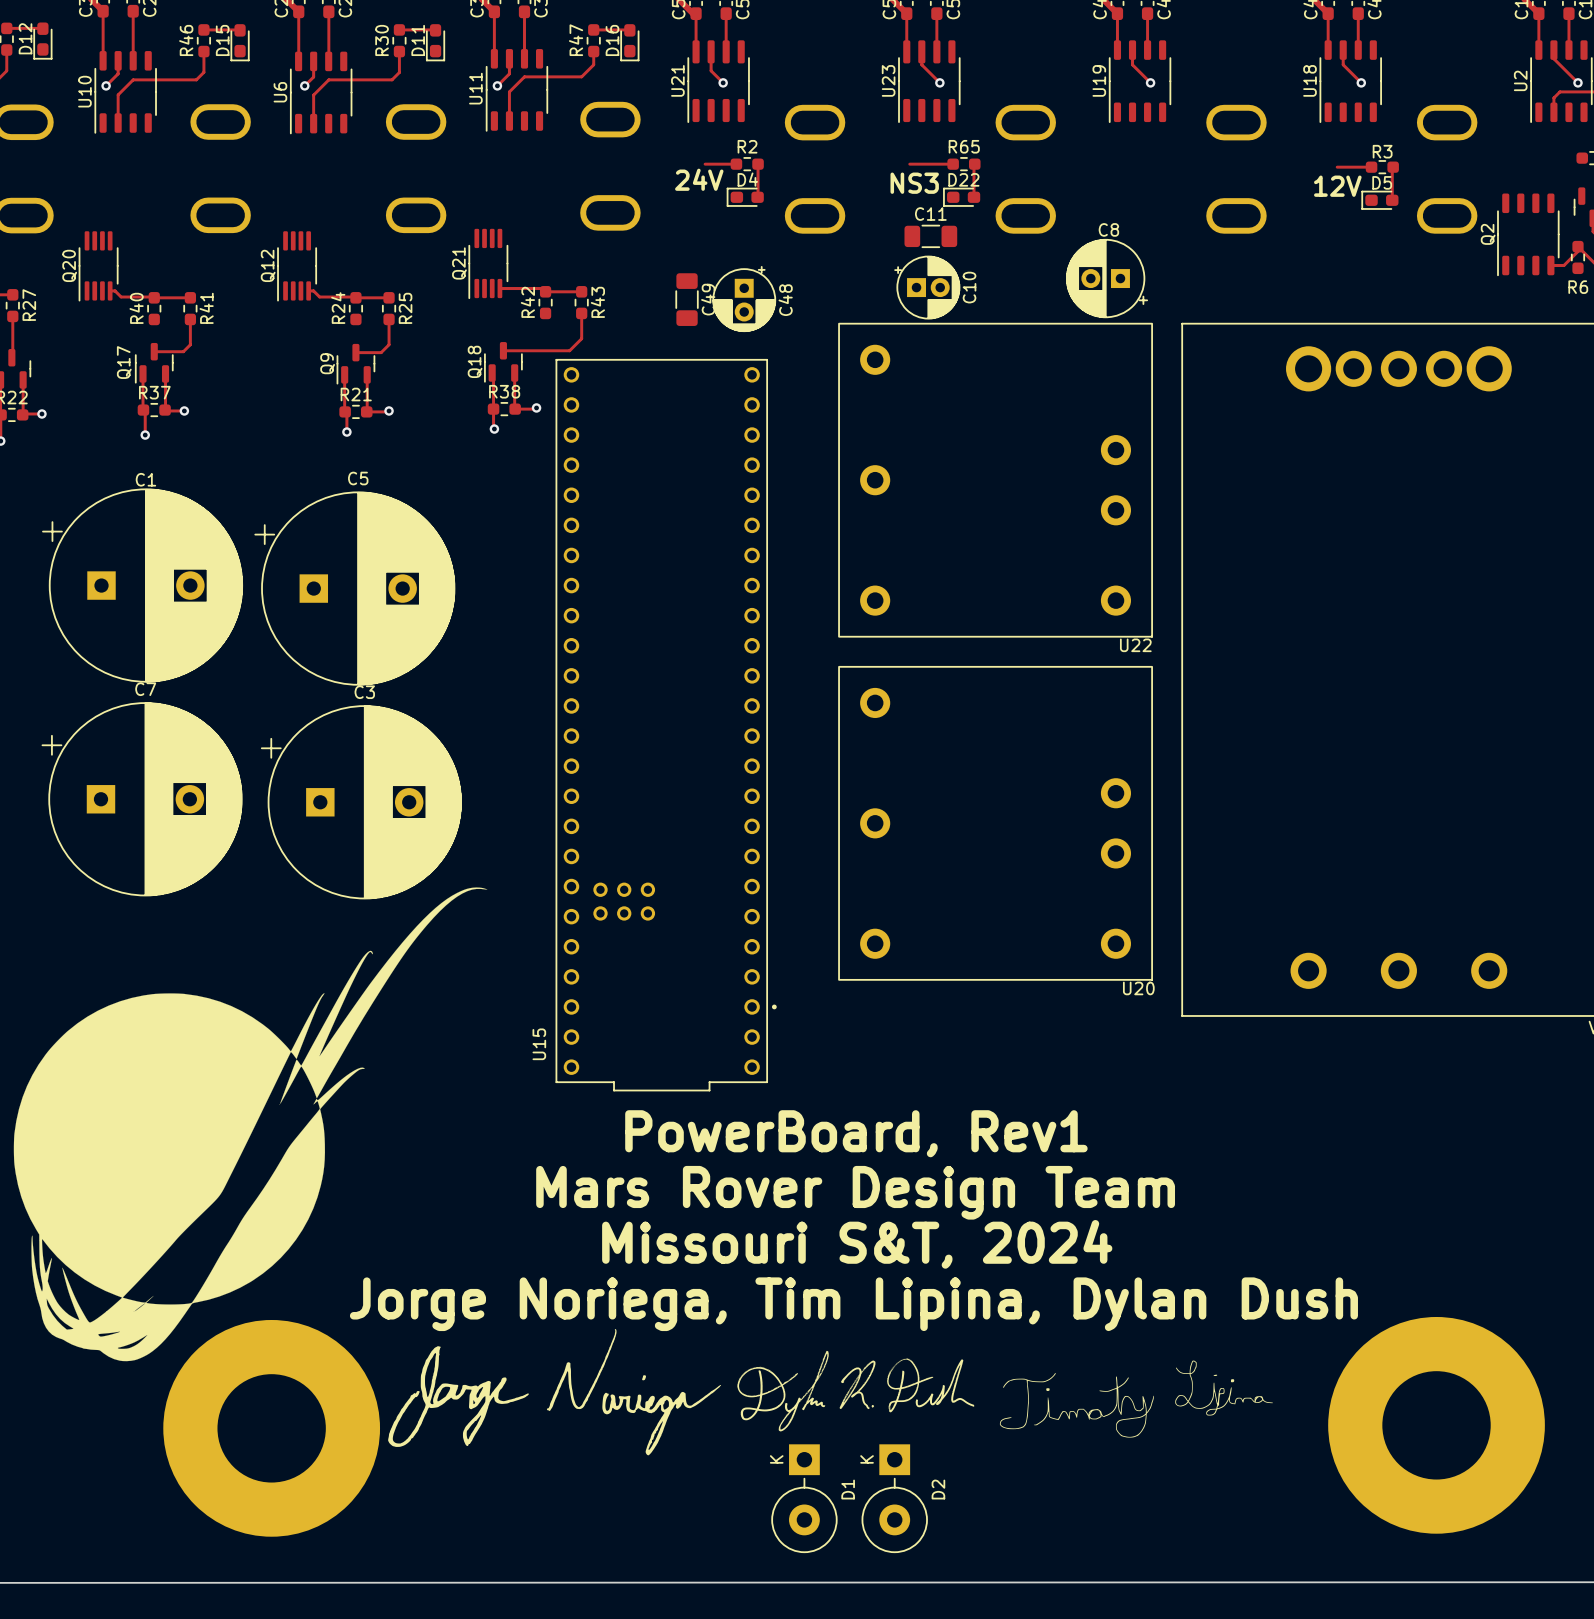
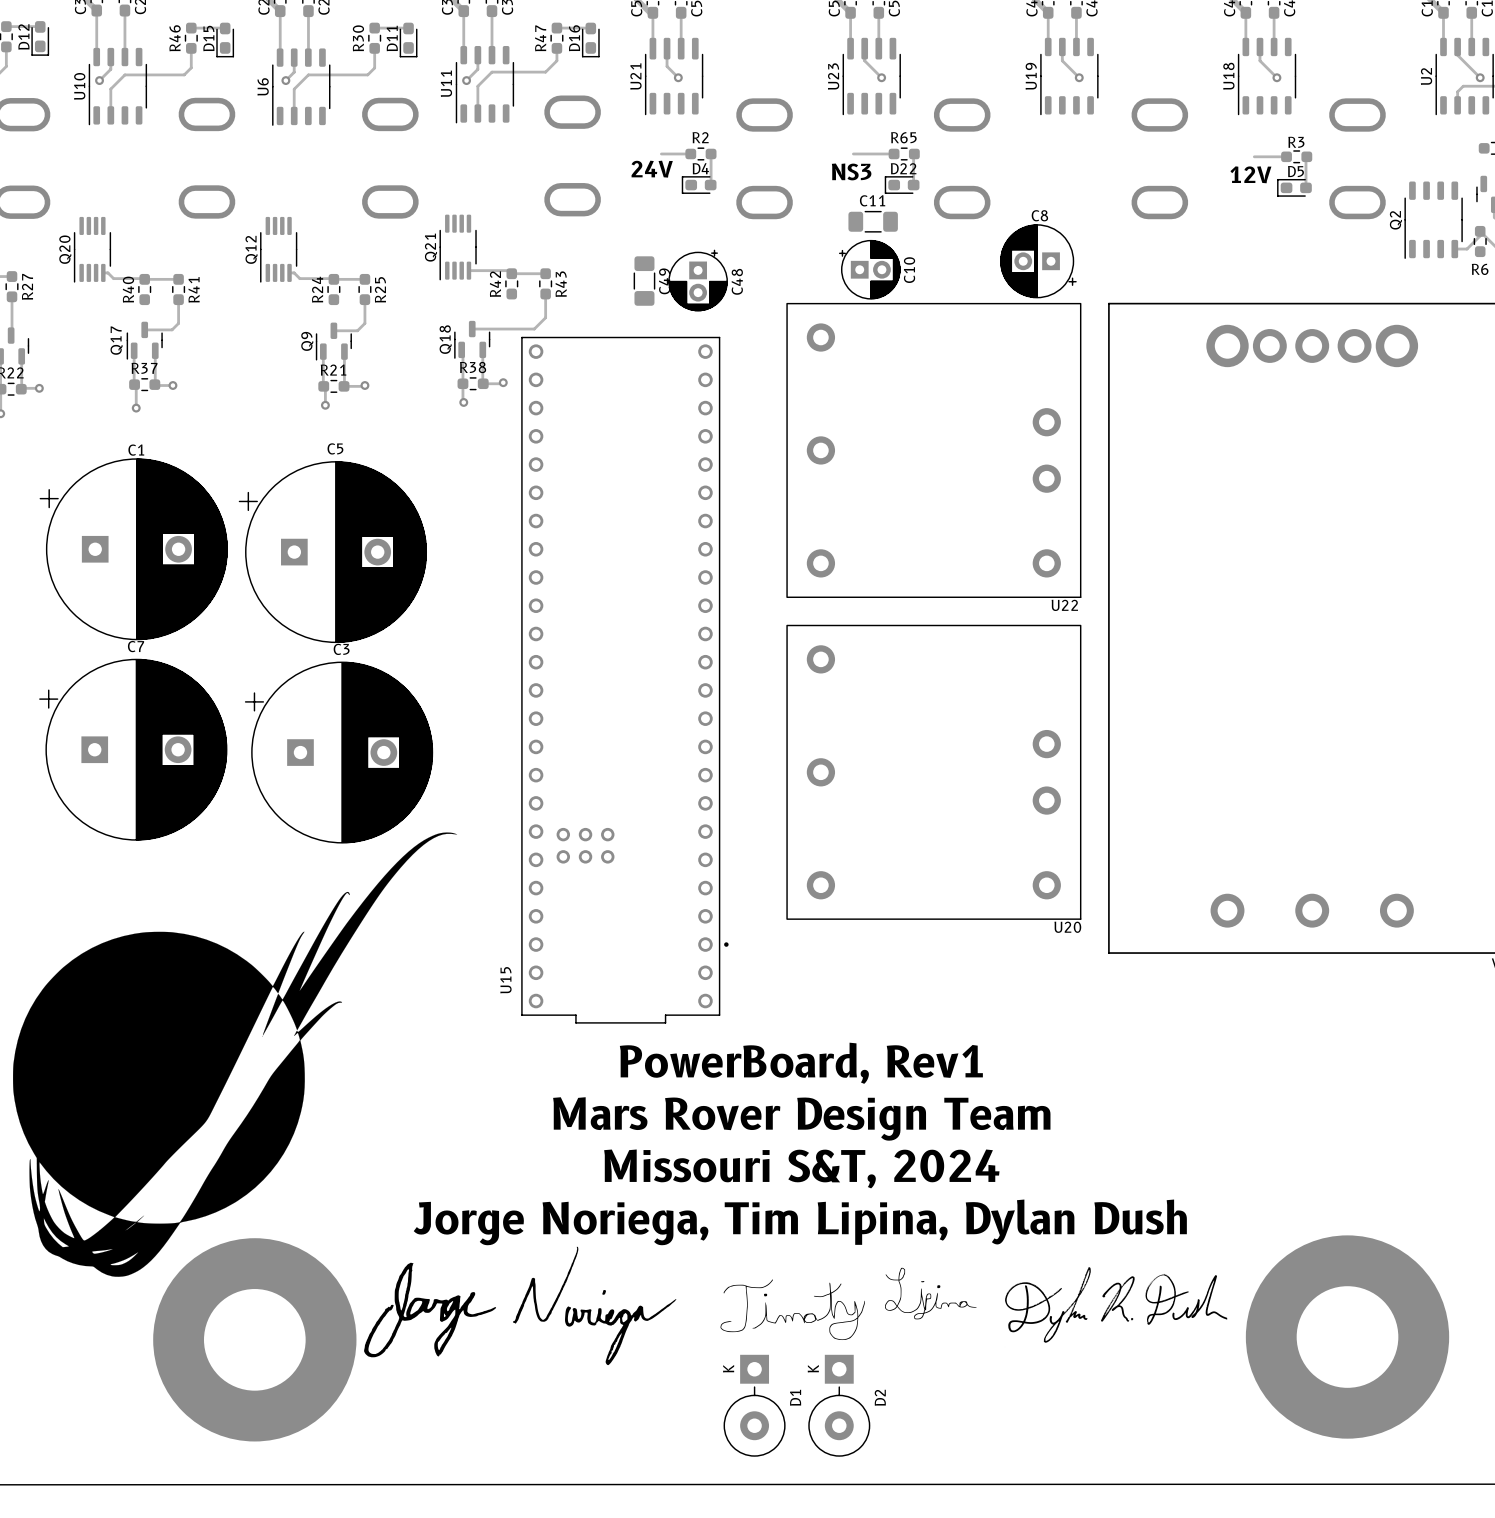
drawing: [737, 1350, 975, 1437] -> none
drawing: none -> [1004, 1267, 1228, 1348]
drawing position: (1136, 1399) -> (848, 1303)

